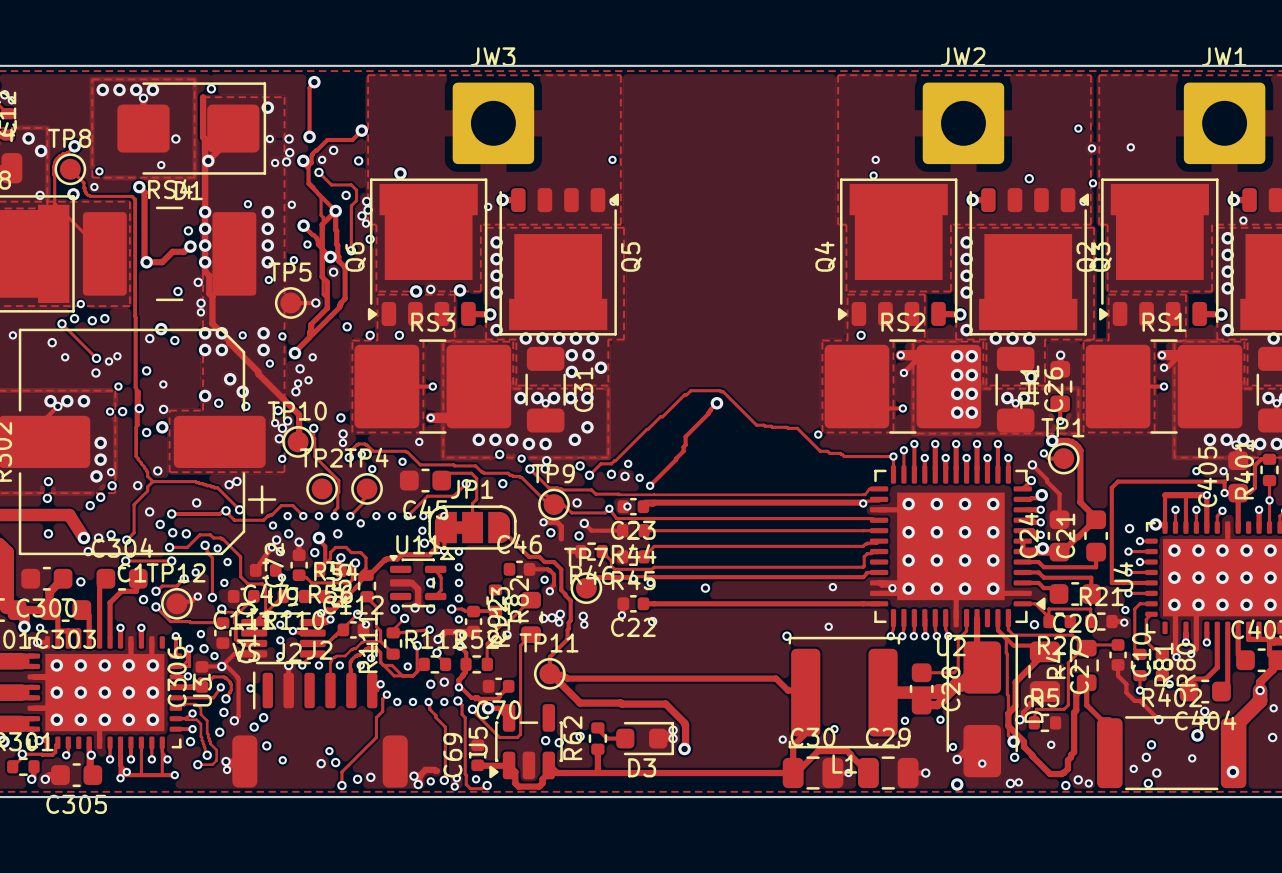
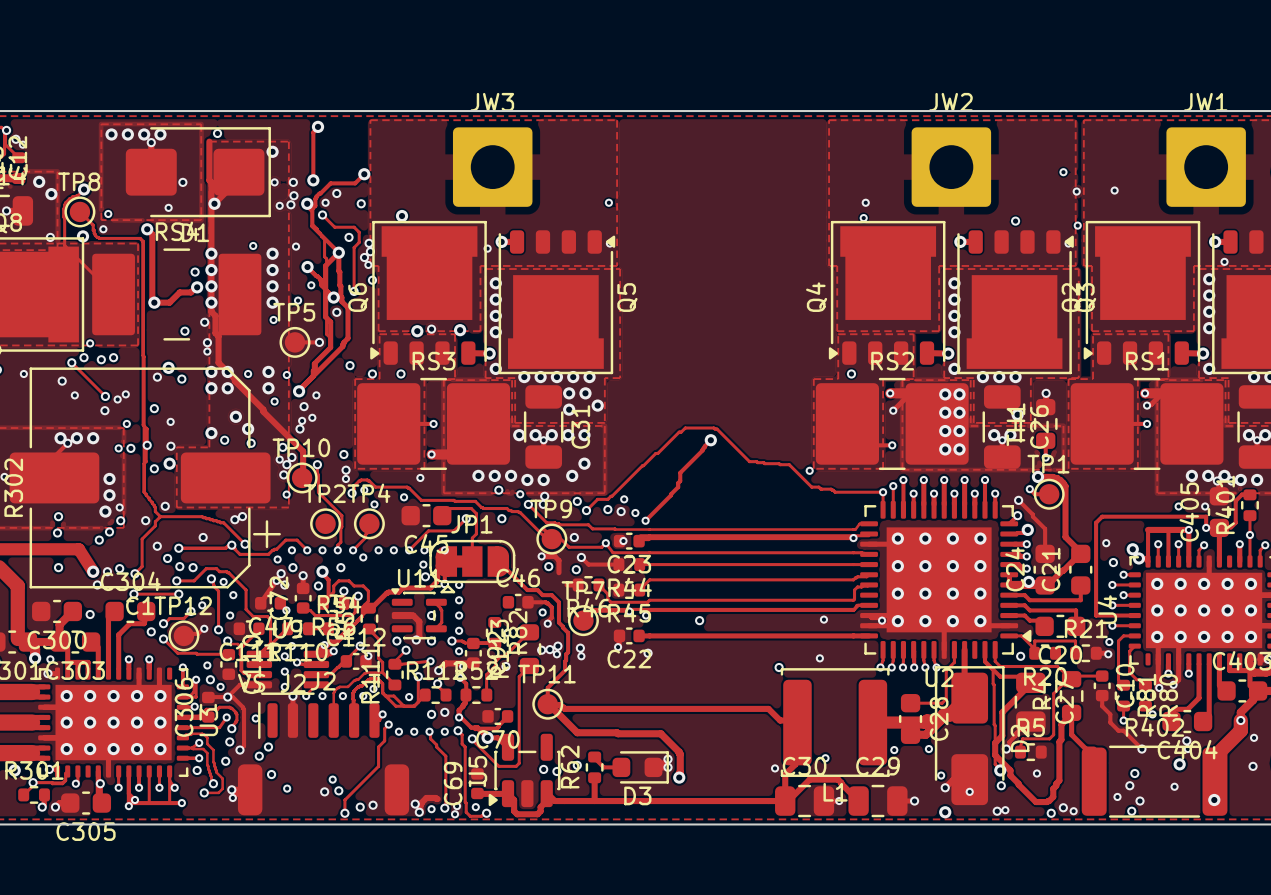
via: none -> (1106, 543)
via: none -> (1132, 549)

